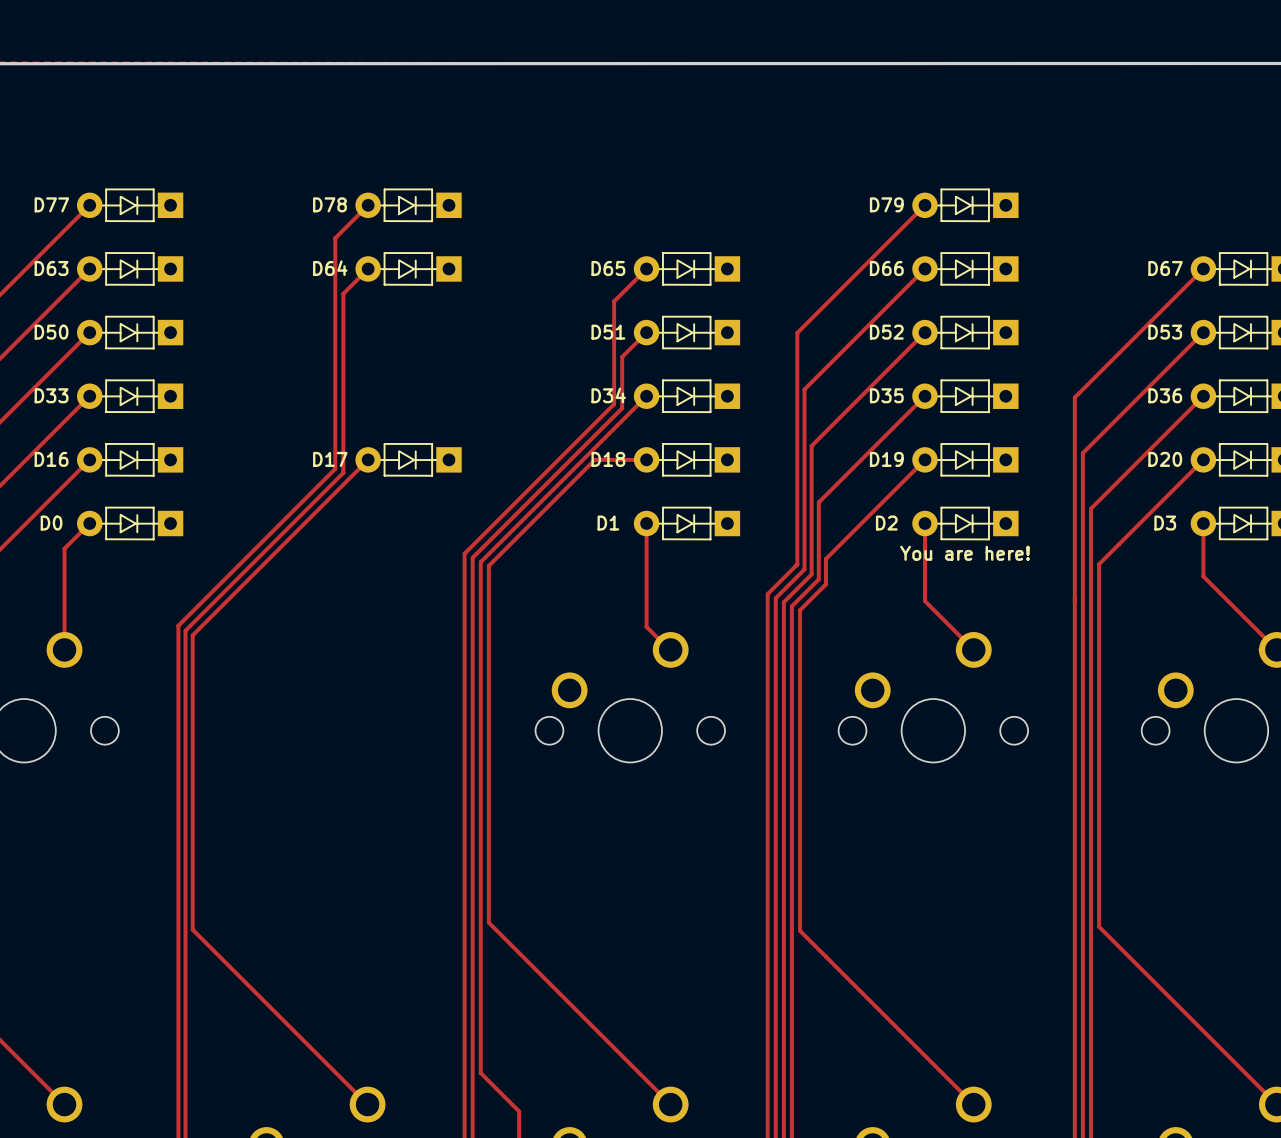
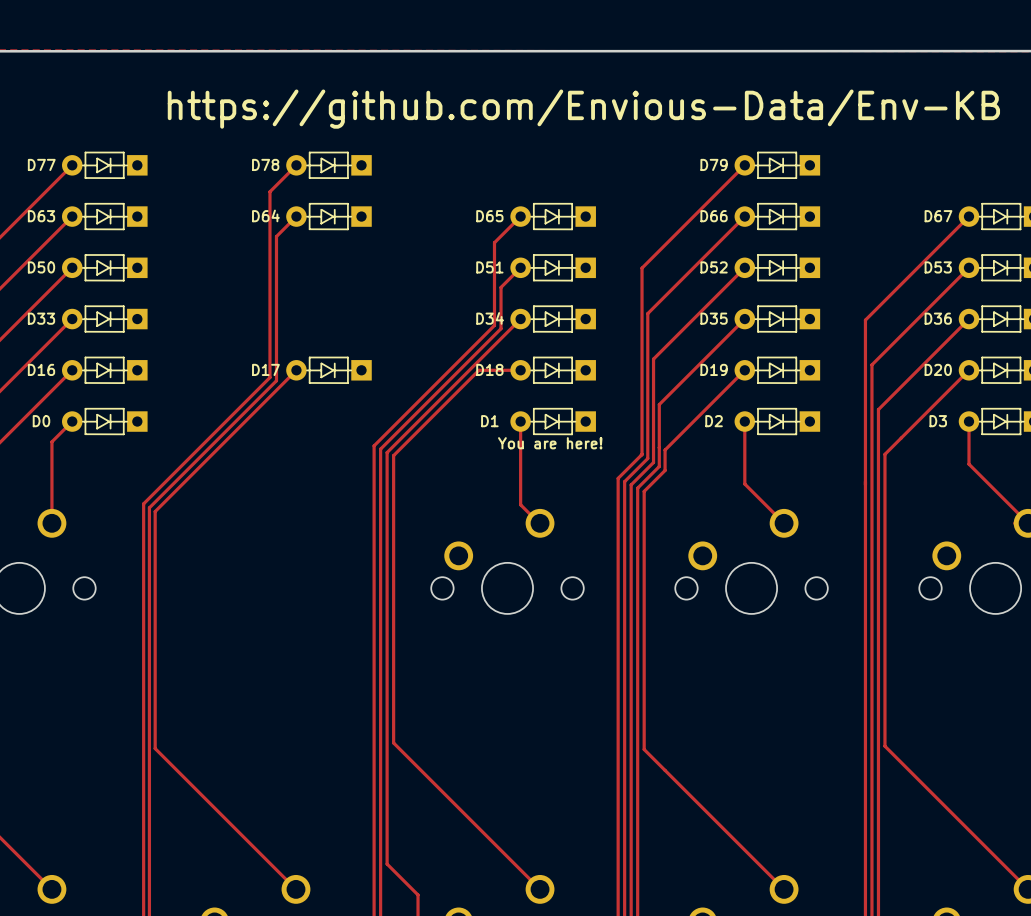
text: none -> https://github.com/Envious-Data/Env-KB (583, 109)
text position: You are here! (964, 553) -> You are here! (550, 443)

